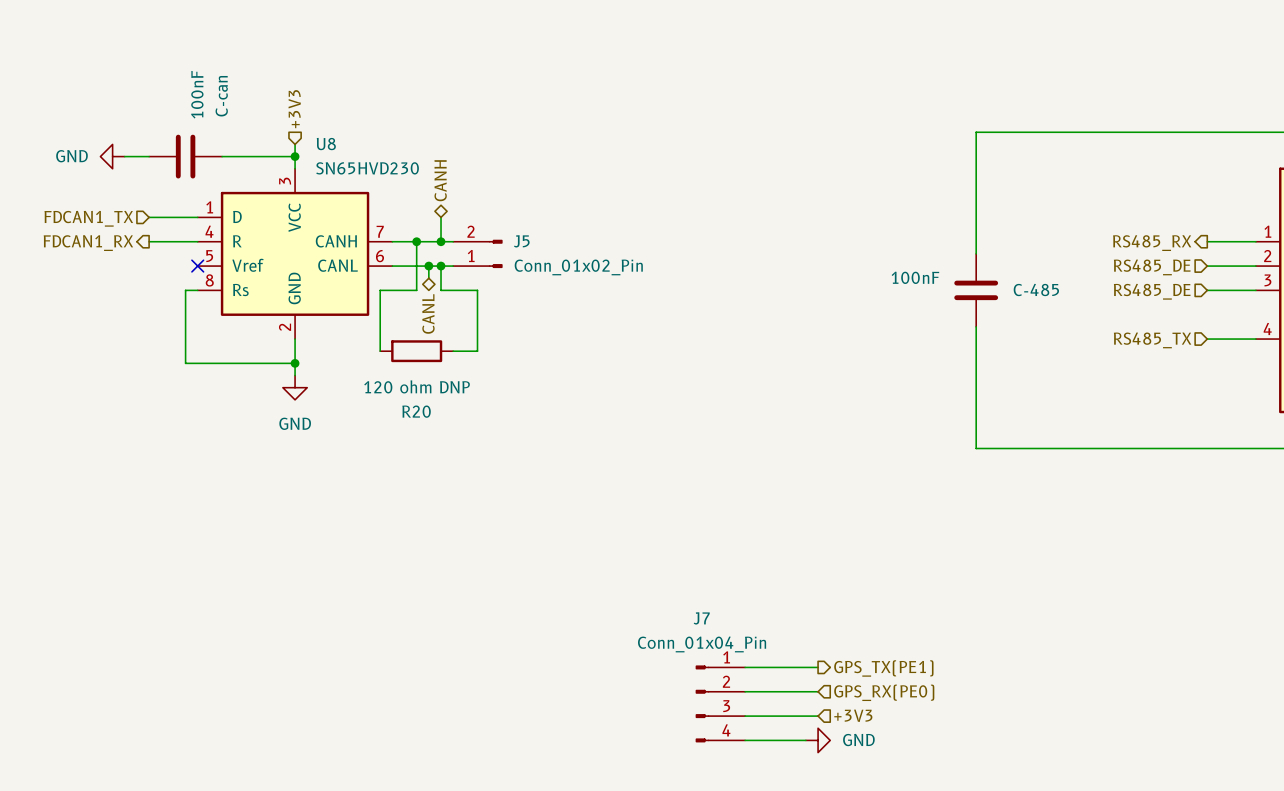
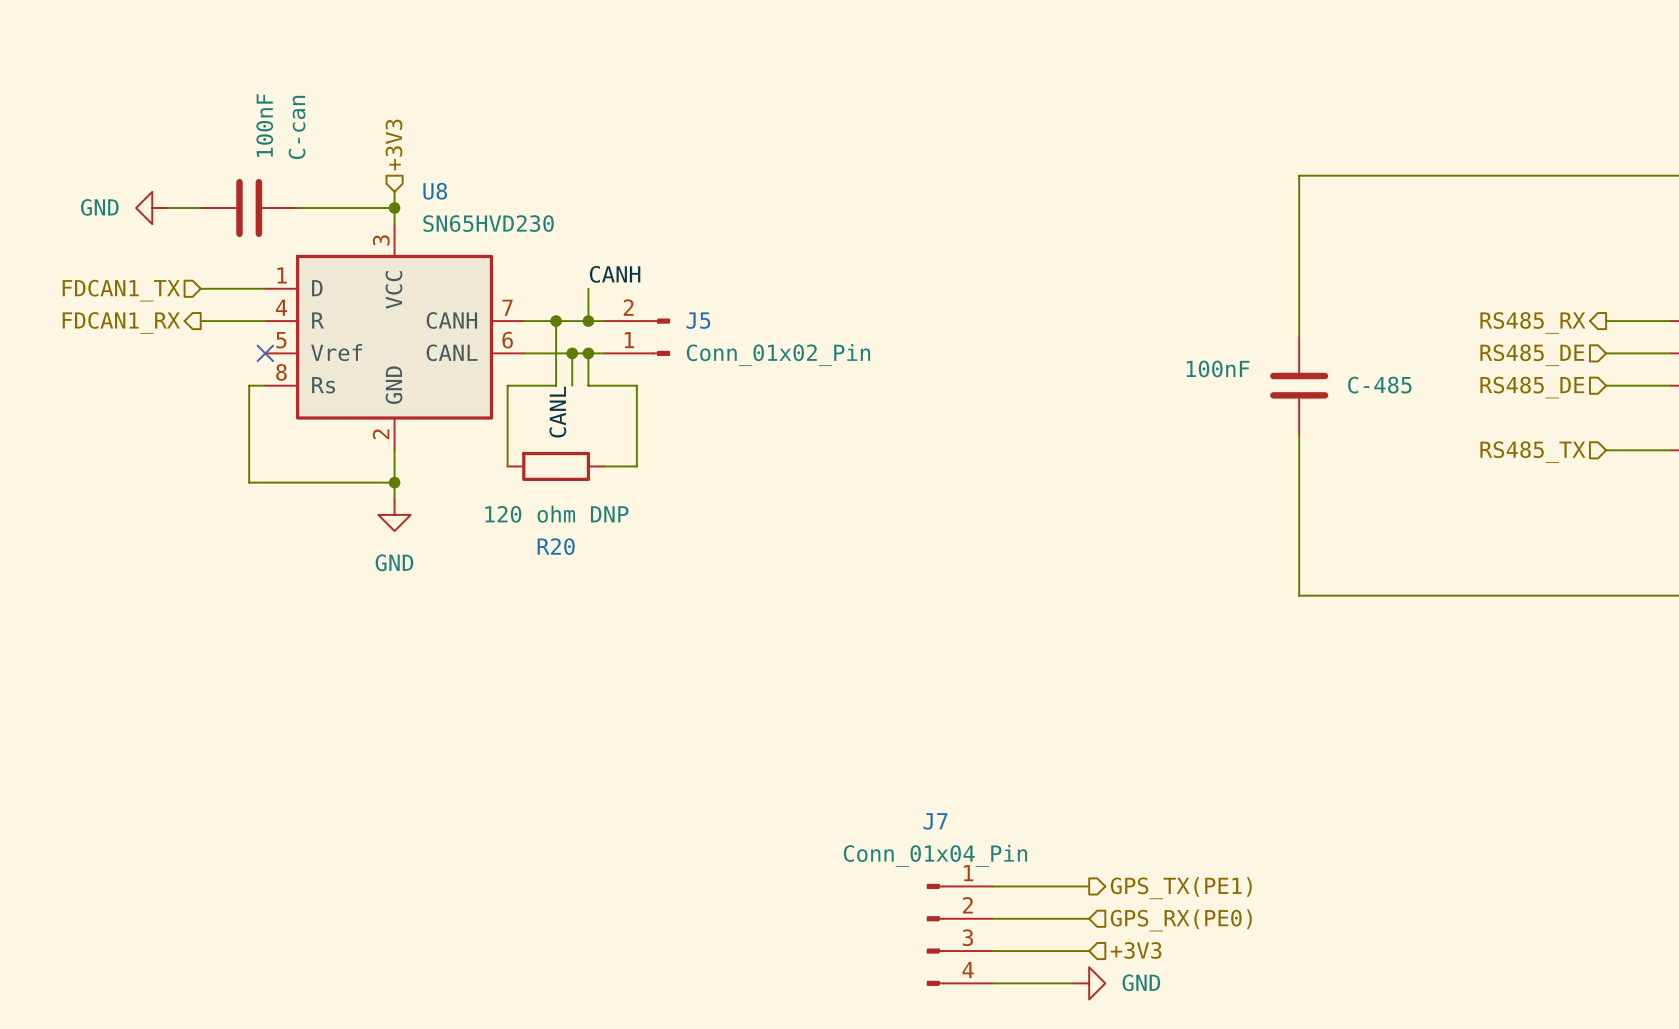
hierarchical label: CANH (440, 180) -> none
label: none -> CANH (615, 274)
wire: none -> (572, 369) (572, 385)
label: none -> CANL (557, 412)
hierarchical label: CANL (428, 313) -> none

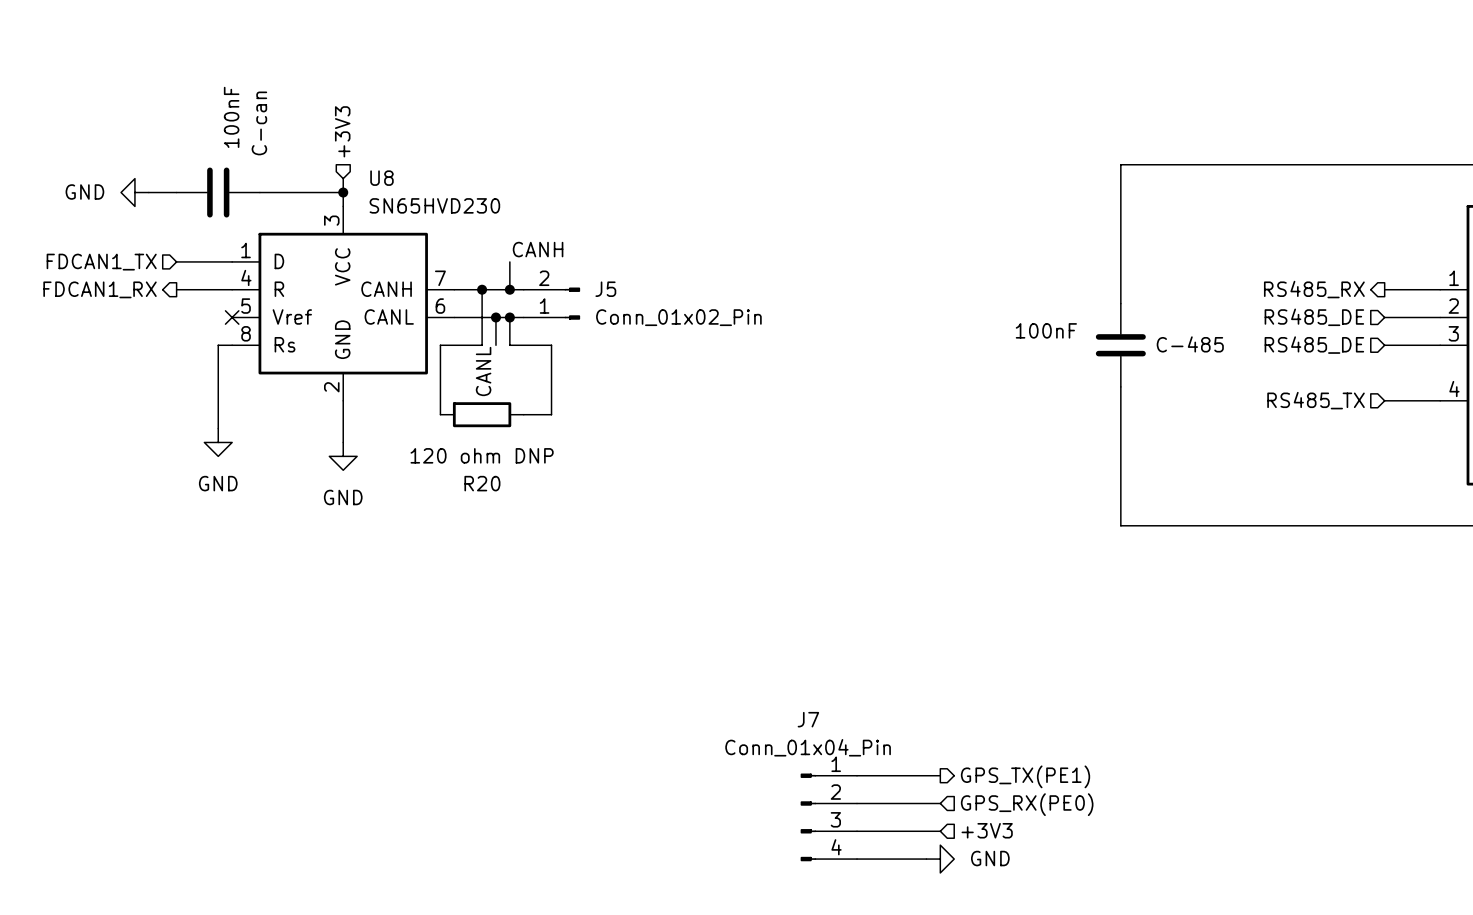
wire: (249, 482) (394, 482) -> none
junction: (394, 482) -> none
power symbol: none -> GND (218, 442)

